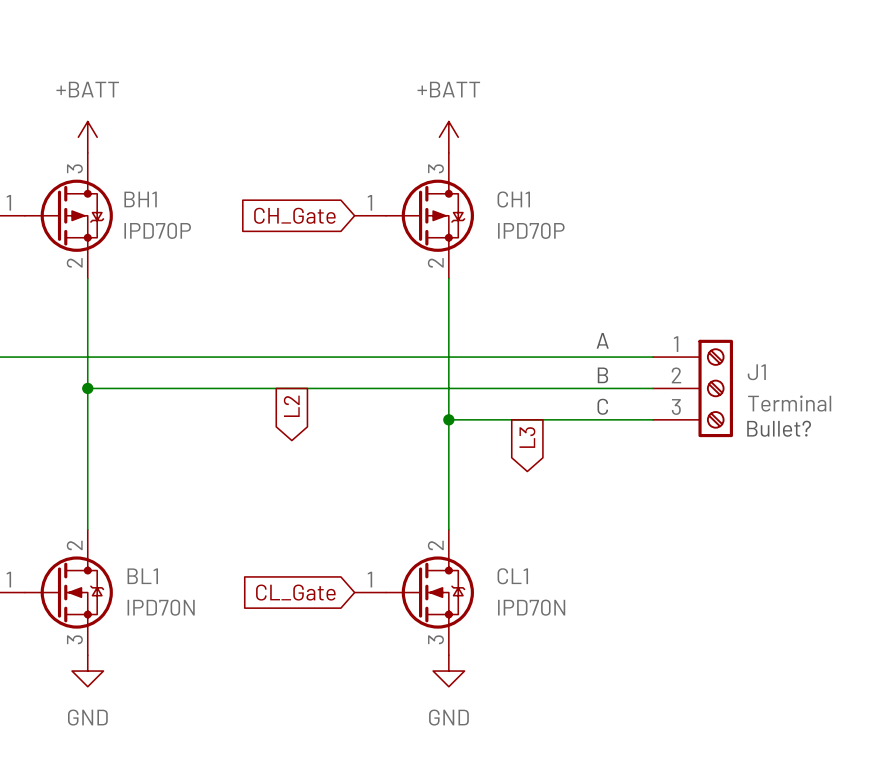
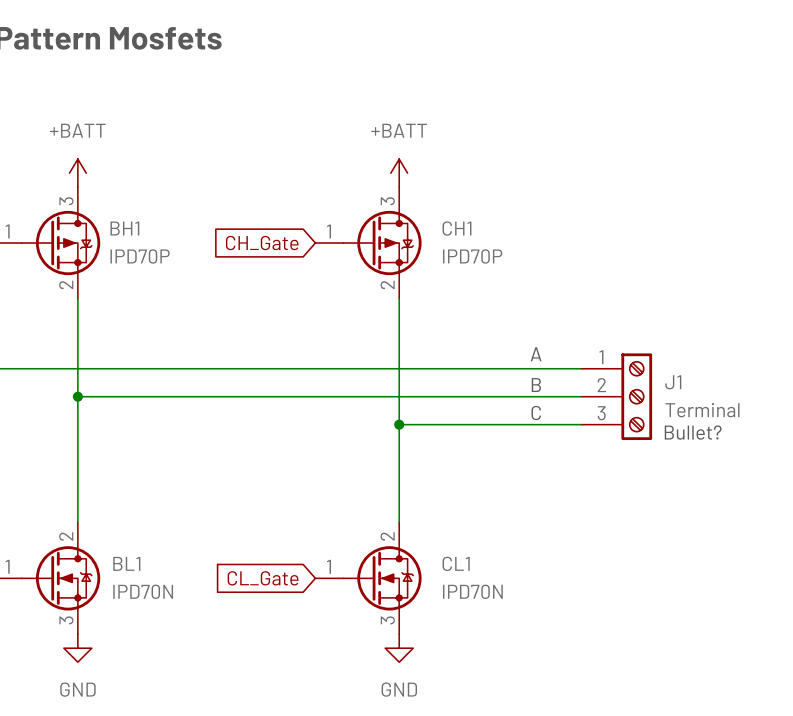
global label: L2 (291, 406) -> none
global label: L3 (527, 437) -> none

